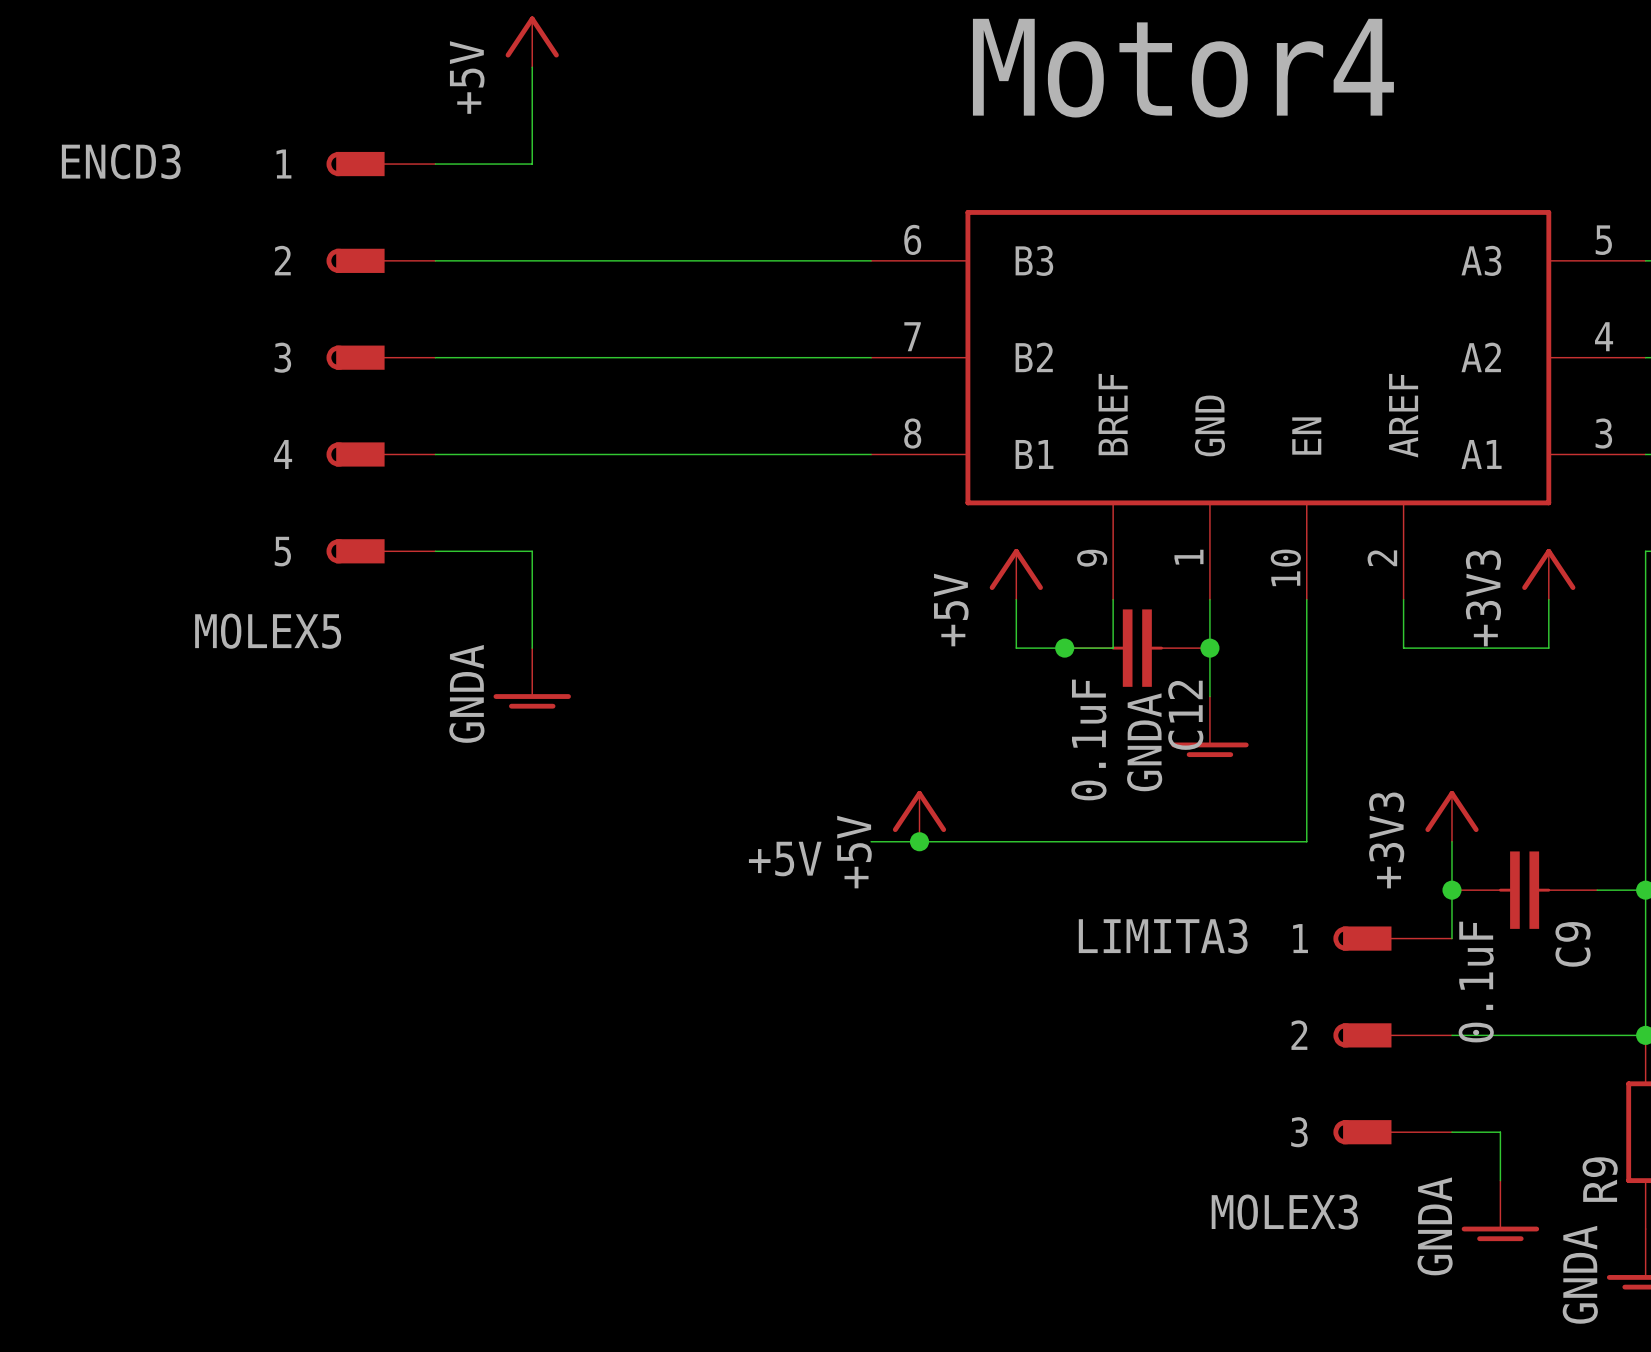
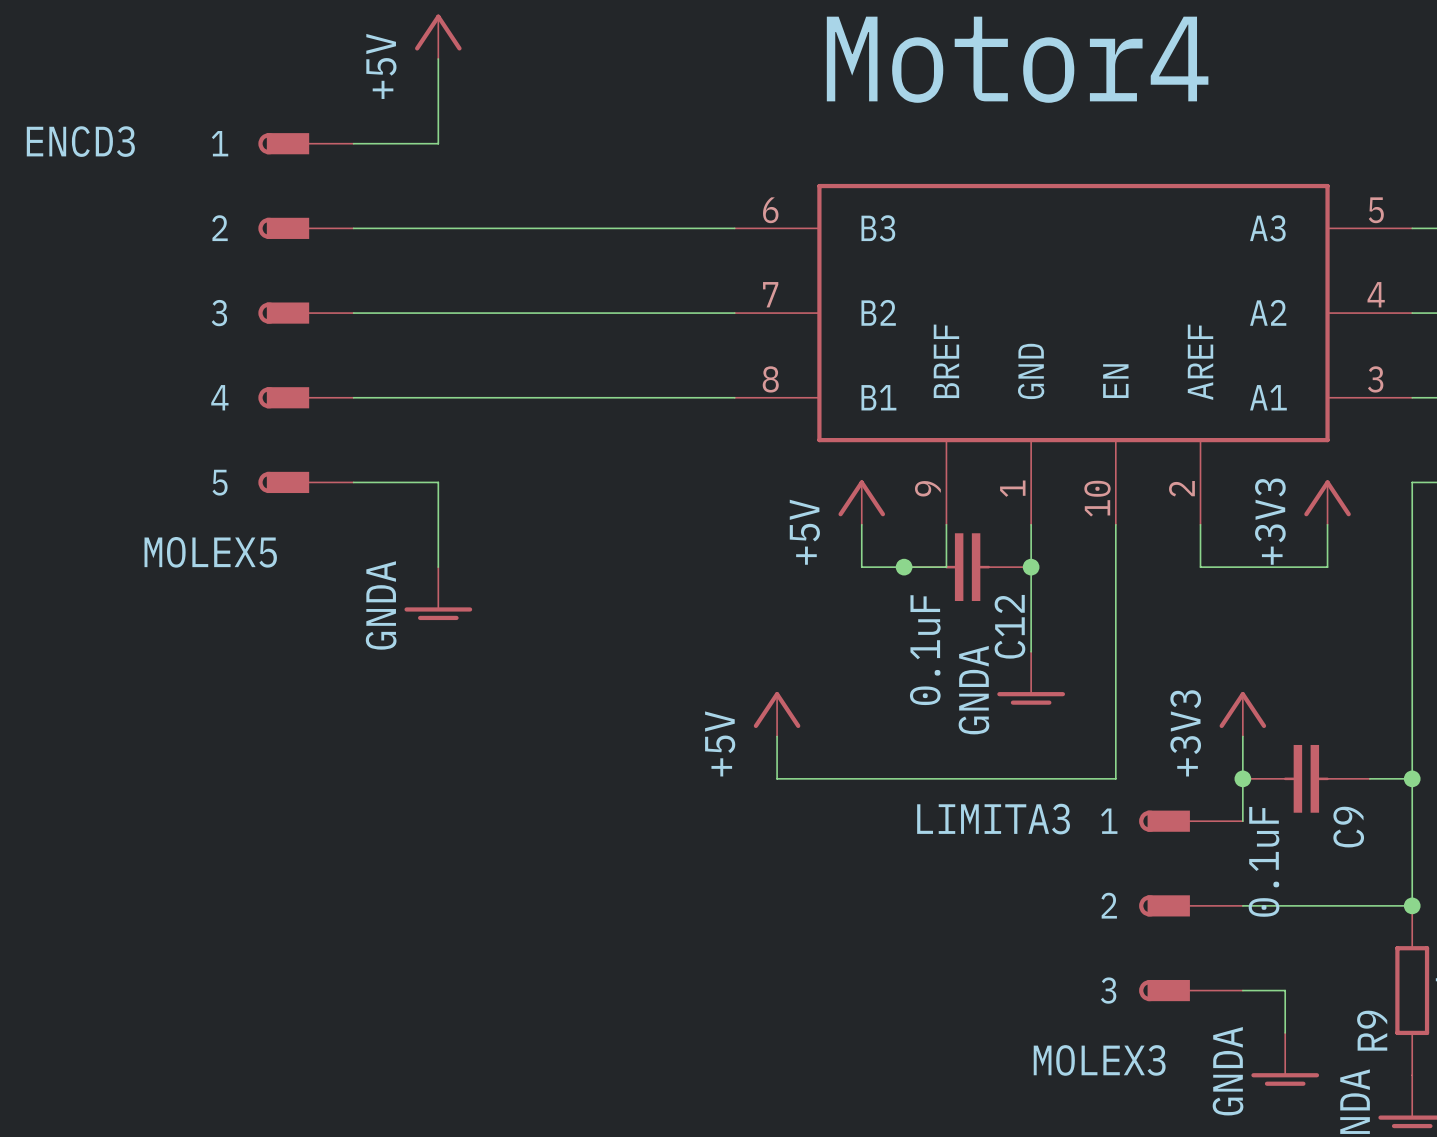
power symbol position: GNDA (1209, 726) -> GNDA (1031, 678)
wire: (871, 841) (1306, 841) -> (777, 736) (777, 778) (1115, 778) (1115, 736)
junction: (919, 841) -> none
label: +5V (785, 859) -> none

